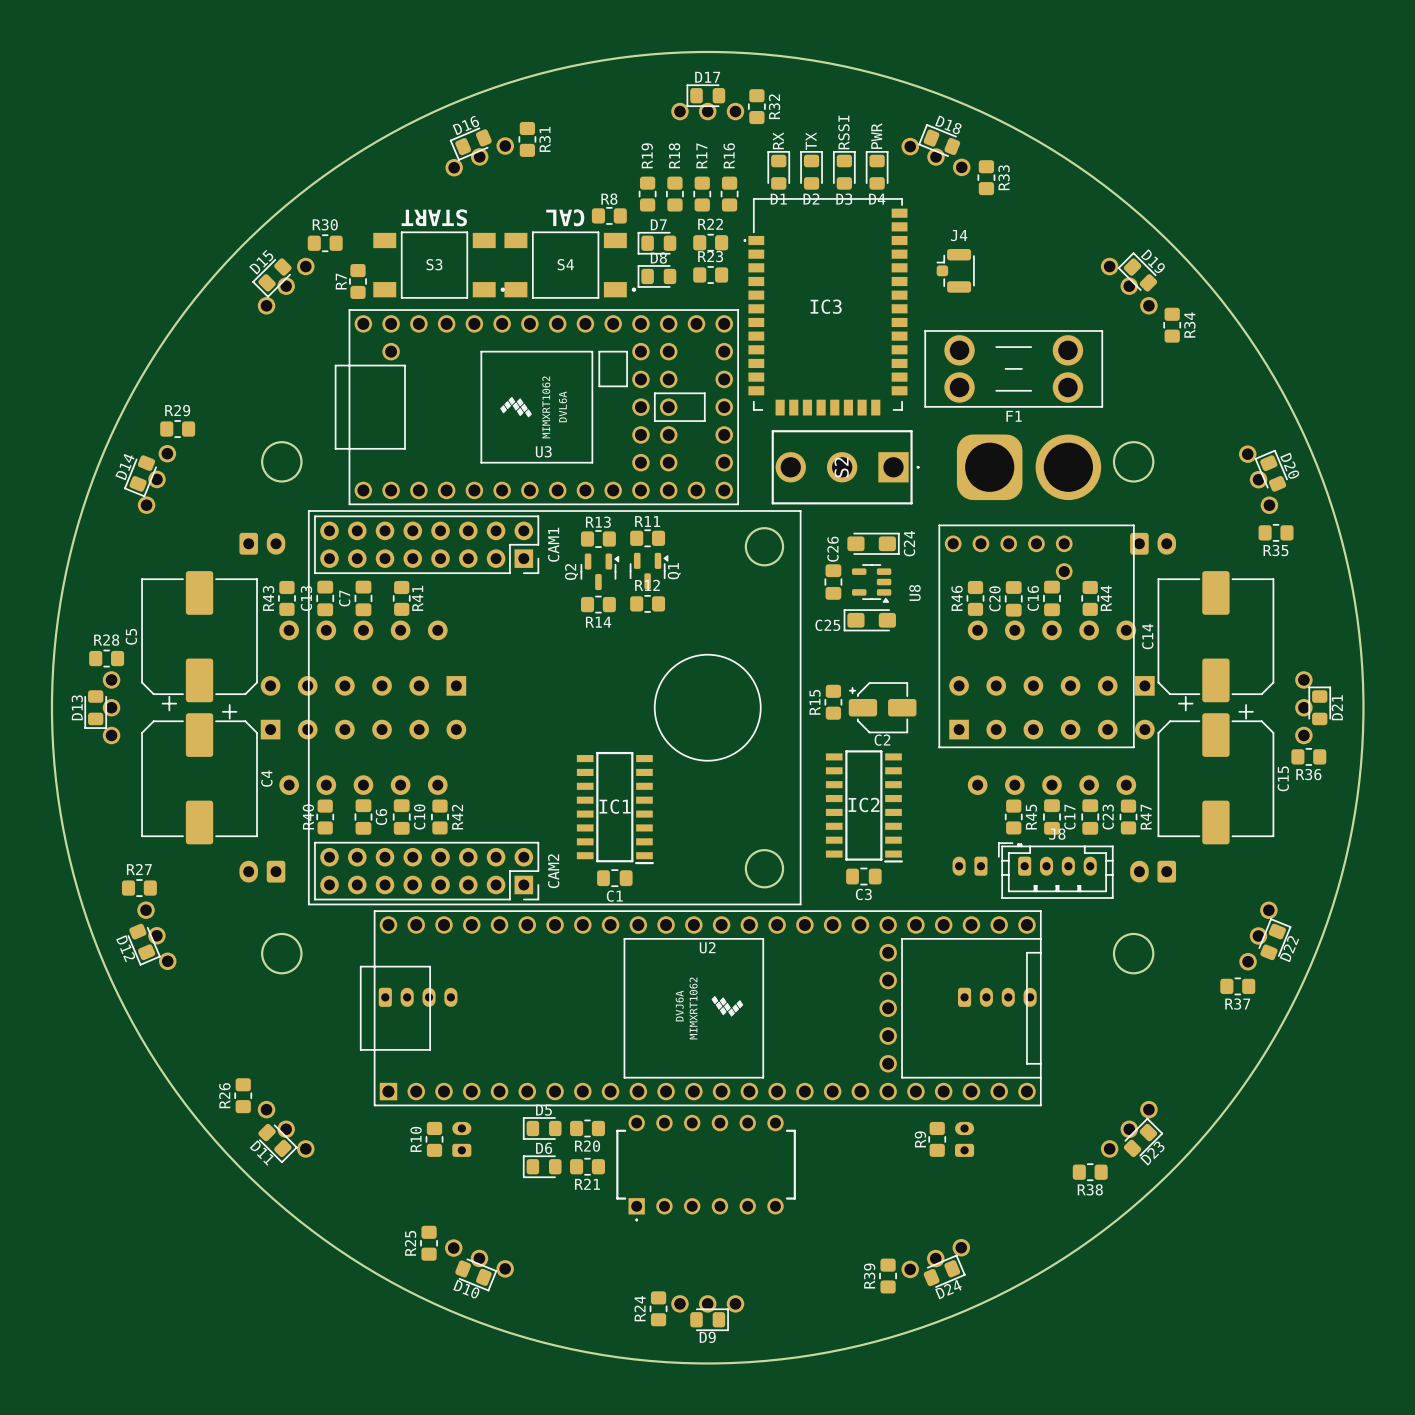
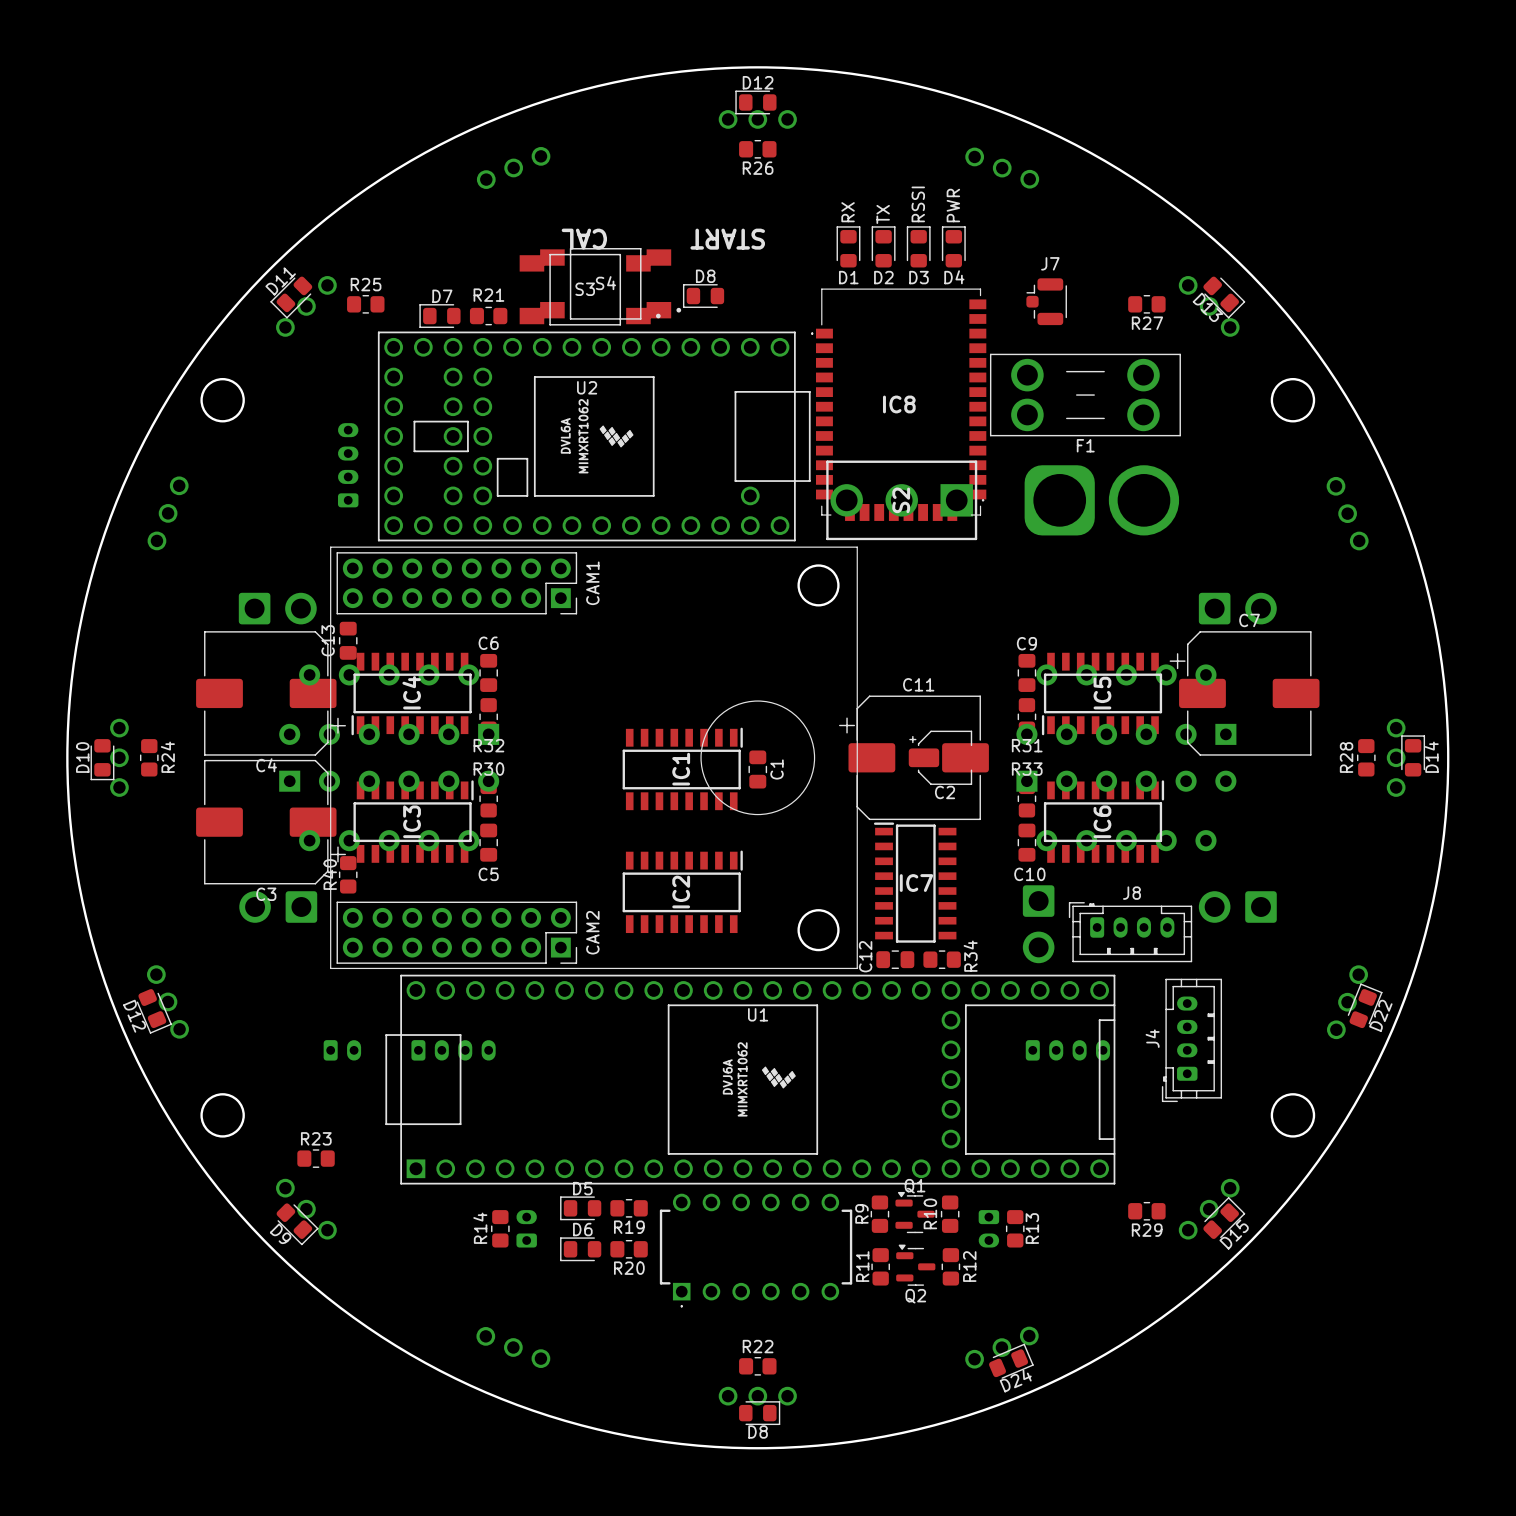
round board edge size: [50, 50, 1365, 1365] -> [66, 66, 1450, 1450]
D17 name: D17 (707, 77) -> D12 (758, 82)
R32 position: (756, 106) -> (488, 716)
R32 name rotation: 0° (774, 106) -> 90° clockwise (488, 745)
text position: RSSI (843, 132) -> RSSI (918, 204)
text position: PWR (876, 136) -> PWR (953, 205)
R31 position: (527, 139) -> (1026, 716)
R31 name rotation: 0° (545, 139) -> 90° clockwise (1027, 745)
text position: RX (778, 140) -> RX (848, 212)
D18: (939, 140) -> none
text position: TX (811, 141) -> TX (883, 214)
D16: (470, 144) -> none
D1 position: (778, 170) -> (848, 246)
D2 position: (811, 170) -> (883, 246)
D3 position: (844, 170) -> (918, 246)
D4 position: (877, 170) -> (953, 246)
R33 position: (986, 177) -> (1026, 798)
R33 name rotation: 0° (1004, 177) -> 90° clockwise (1027, 769)
R19: (647, 194) -> none
R18: (674, 194) -> none
R17: (702, 194) -> none
R16: (729, 194) -> none
IC3 footprint: [743, 198, 908, 416] -> [353, 780, 474, 863]
R8: (609, 215) -> none
text position: START (434, 217) -> START (727, 239)
text position: CAL (565, 217) -> CAL (584, 239)
J4 name position: J4 (959, 235) -> J4 (1152, 1038)
R22 position: (710, 242) -> (757, 1366)
R30 rotation: 0° (325, 243) -> 90° clockwise (488, 798)
R30 position: (325, 243) -> (488, 798)
D7 position: (657, 243) -> (439, 316)
J4 footprint: [936, 248, 975, 293] -> [1161, 978, 1223, 1103]
D15 name: D15 (261, 262) -> D11 (280, 281)
S3 position: (439, 265) -> (590, 289)
D19: (1137, 272) -> none
R23 position: (710, 274) -> (316, 1158)
D13: none -> (1224, 297)
R7: (358, 281) -> none
J7: none -> (1046, 301)
R21: none -> (488, 316)
R34 rotation: 0° (1172, 325) -> 90° clockwise (942, 959)
R34 position: (1172, 325) -> (942, 959)
IC8: none -> (898, 404)
U3: (536, 407) -> none
U2: none -> (594, 436)
R29 name position: R29 (177, 410) -> R29 (1147, 1230)
R29 position: (177, 429) -> (1146, 1211)
part: none -> (348, 465)
round board edge position: (281, 461) -> (222, 400)
round board edge position: (1133, 461) -> (1292, 400)
D20: (1271, 470) -> none
D14: (140, 476) -> none
R11 name position: R11 (647, 521) -> R11 (862, 1266)
R35: (1276, 532) -> none
R11 rotation: 0° (647, 538) -> 90° clockwise (880, 1266)
R11 position: (647, 538) -> (880, 1266)
R13 rotation: 0° (598, 539) -> 90° clockwise (1015, 1228)
R13 position: (598, 539) -> (1015, 1228)
part: (262, 543) -> none
C24: (873, 543) -> none
part: (1153, 543) -> none
part: none -> (277, 608)
part: none -> (1237, 608)
C5 footprint: [141, 571, 258, 712] -> [479, 823, 498, 862]
Q2 rotation: 0° (599, 571) -> 90° counterclockwise (915, 1265)
Q2 position: (599, 571) -> (915, 1265)
Q1 rotation: 0° (649, 571) -> 90° counterclockwise (915, 1212)
Q1 position: (649, 571) -> (915, 1212)
C7 footprint: [354, 580, 373, 617] -> [1169, 631, 1320, 756]
C26: (833, 582) -> none
U8: (871, 583) -> none
R43: (286, 598) -> none
C7 name position: C7 (344, 598) -> C7 (1249, 620)
R41: (401, 598) -> none
R46: (975, 598) -> none
C20: (1013, 598) -> none
C16: (1051, 598) -> none
R44: (1090, 598) -> none
R12 rotation: 0° (647, 603) -> 90° clockwise (950, 1266)
R12 position: (647, 603) -> (950, 1266)
R14 rotation: 0° (598, 604) -> 90° clockwise (500, 1228)
R14 position: (598, 604) -> (500, 1228)
C25: (869, 620) -> none
C9: none -> (1026, 672)
C5 name position: C5 (131, 636) -> C5 (488, 874)
part: (1036, 636) -> none
R28 name position: R28 (106, 640) -> R28 (1346, 757)
C14: (1215, 641) -> none
IC4: none -> (411, 694)
IC5: none -> (1102, 694)
R28 rotation: 0° (106, 658) -> 90° clockwise (1366, 757)
R28 position: (106, 658) -> (1366, 757)
R15: (833, 702) -> none
D13 name: D13 (77, 707) -> D10 (82, 757)
C11: none -> (913, 757)
D21 name: D21 (1337, 707) -> D14 (1431, 757)
R36: (1308, 756) -> none
IC6: none -> (1104, 821)
C4 rotation: 0° (199, 774) -> 90° clockwise (271, 693)
C4 position: (199, 774) -> (271, 693)
C15: (1215, 774) -> none
IC2 rotation: 0° (864, 806) -> 90° counterclockwise (682, 891)
IC2 position: (864, 806) -> (682, 891)
IC1 rotation: 0° (615, 808) -> 90° counterclockwise (682, 768)
IC1 position: (615, 808) -> (682, 768)
C6 name rotation: 0° (381, 816) -> 90° clockwise (488, 643)
C6 name position: C6 (381, 816) -> C6 (488, 643)
C10 name rotation: 0° (419, 816) -> 90° clockwise (1029, 874)
C6 position: (363, 817) -> (488, 672)
C10 position: (401, 817) -> (1026, 842)
R42: (439, 817) -> none
R45: (1013, 817) -> none
C17: (1051, 817) -> none
C23: (1090, 817) -> none
R47: (1128, 817) -> none
IC7: none -> (915, 882)
part: none -> (278, 907)
part: none -> (1237, 907)
part footprint: [952, 856, 988, 876] -> [1022, 885, 1055, 964]
C3 footprint: [846, 867, 882, 886] -> [196, 759, 346, 885]
R27 name position: R27 (139, 869) -> R27 (1147, 323)
part: (262, 871) -> none
part: (1153, 871) -> none
C1 rotation: 0° (614, 878) -> 90° clockwise (757, 769)
C1 position: (614, 878) -> (757, 769)
R27 position: (139, 888) -> (1146, 304)
C3 name position: C3 (863, 894) -> C3 (266, 894)
C1 name position: C1 (614, 896) -> C1 (777, 769)
C12: none -> (895, 959)
U2 name: U2 (707, 947) -> U1 (758, 1014)
round board edge position: (281, 953) -> (222, 1115)
round board edge position: (1133, 953) -> (1292, 1115)
part: none -> (342, 1050)
R37: (1237, 986) -> none
part position: (418, 997) -> (453, 1050)
part position: (997, 997) -> (1067, 1050)
R26 name position: R26 (224, 1095) -> R26 (758, 168)
R26 rotation: 0° (243, 1095) -> 90° clockwise (757, 149)
R26 position: (243, 1095) -> (757, 149)
R10 position: (434, 1139) -> (950, 1214)
part position: (461, 1139) -> (526, 1228)
R9 position: (937, 1139) -> (879, 1214)
part rotation: 0° (964, 1139) -> 180° (988, 1228)
part position: (964, 1139) -> (988, 1228)
R20 name: R20 (587, 1146) -> R19 (629, 1227)
D11 name: D11 (261, 1152) -> D9 (280, 1233)
D23 name: D23 (1152, 1153) -> D15 (1234, 1234)
R38: (1090, 1172) -> none
R21 name: R21 (587, 1184) -> R20 (629, 1268)
R25 rotation: 0° (429, 1243) -> 90° clockwise (365, 304)
R25 position: (429, 1243) -> (365, 304)
D10: (476, 1274) -> none
R39: (888, 1276) -> none
R24 name position: R24 (640, 1308) -> R24 (167, 757)
R24 position: (658, 1308) -> (149, 757)
D9 name: D9 (707, 1337) -> D8 (758, 1431)

